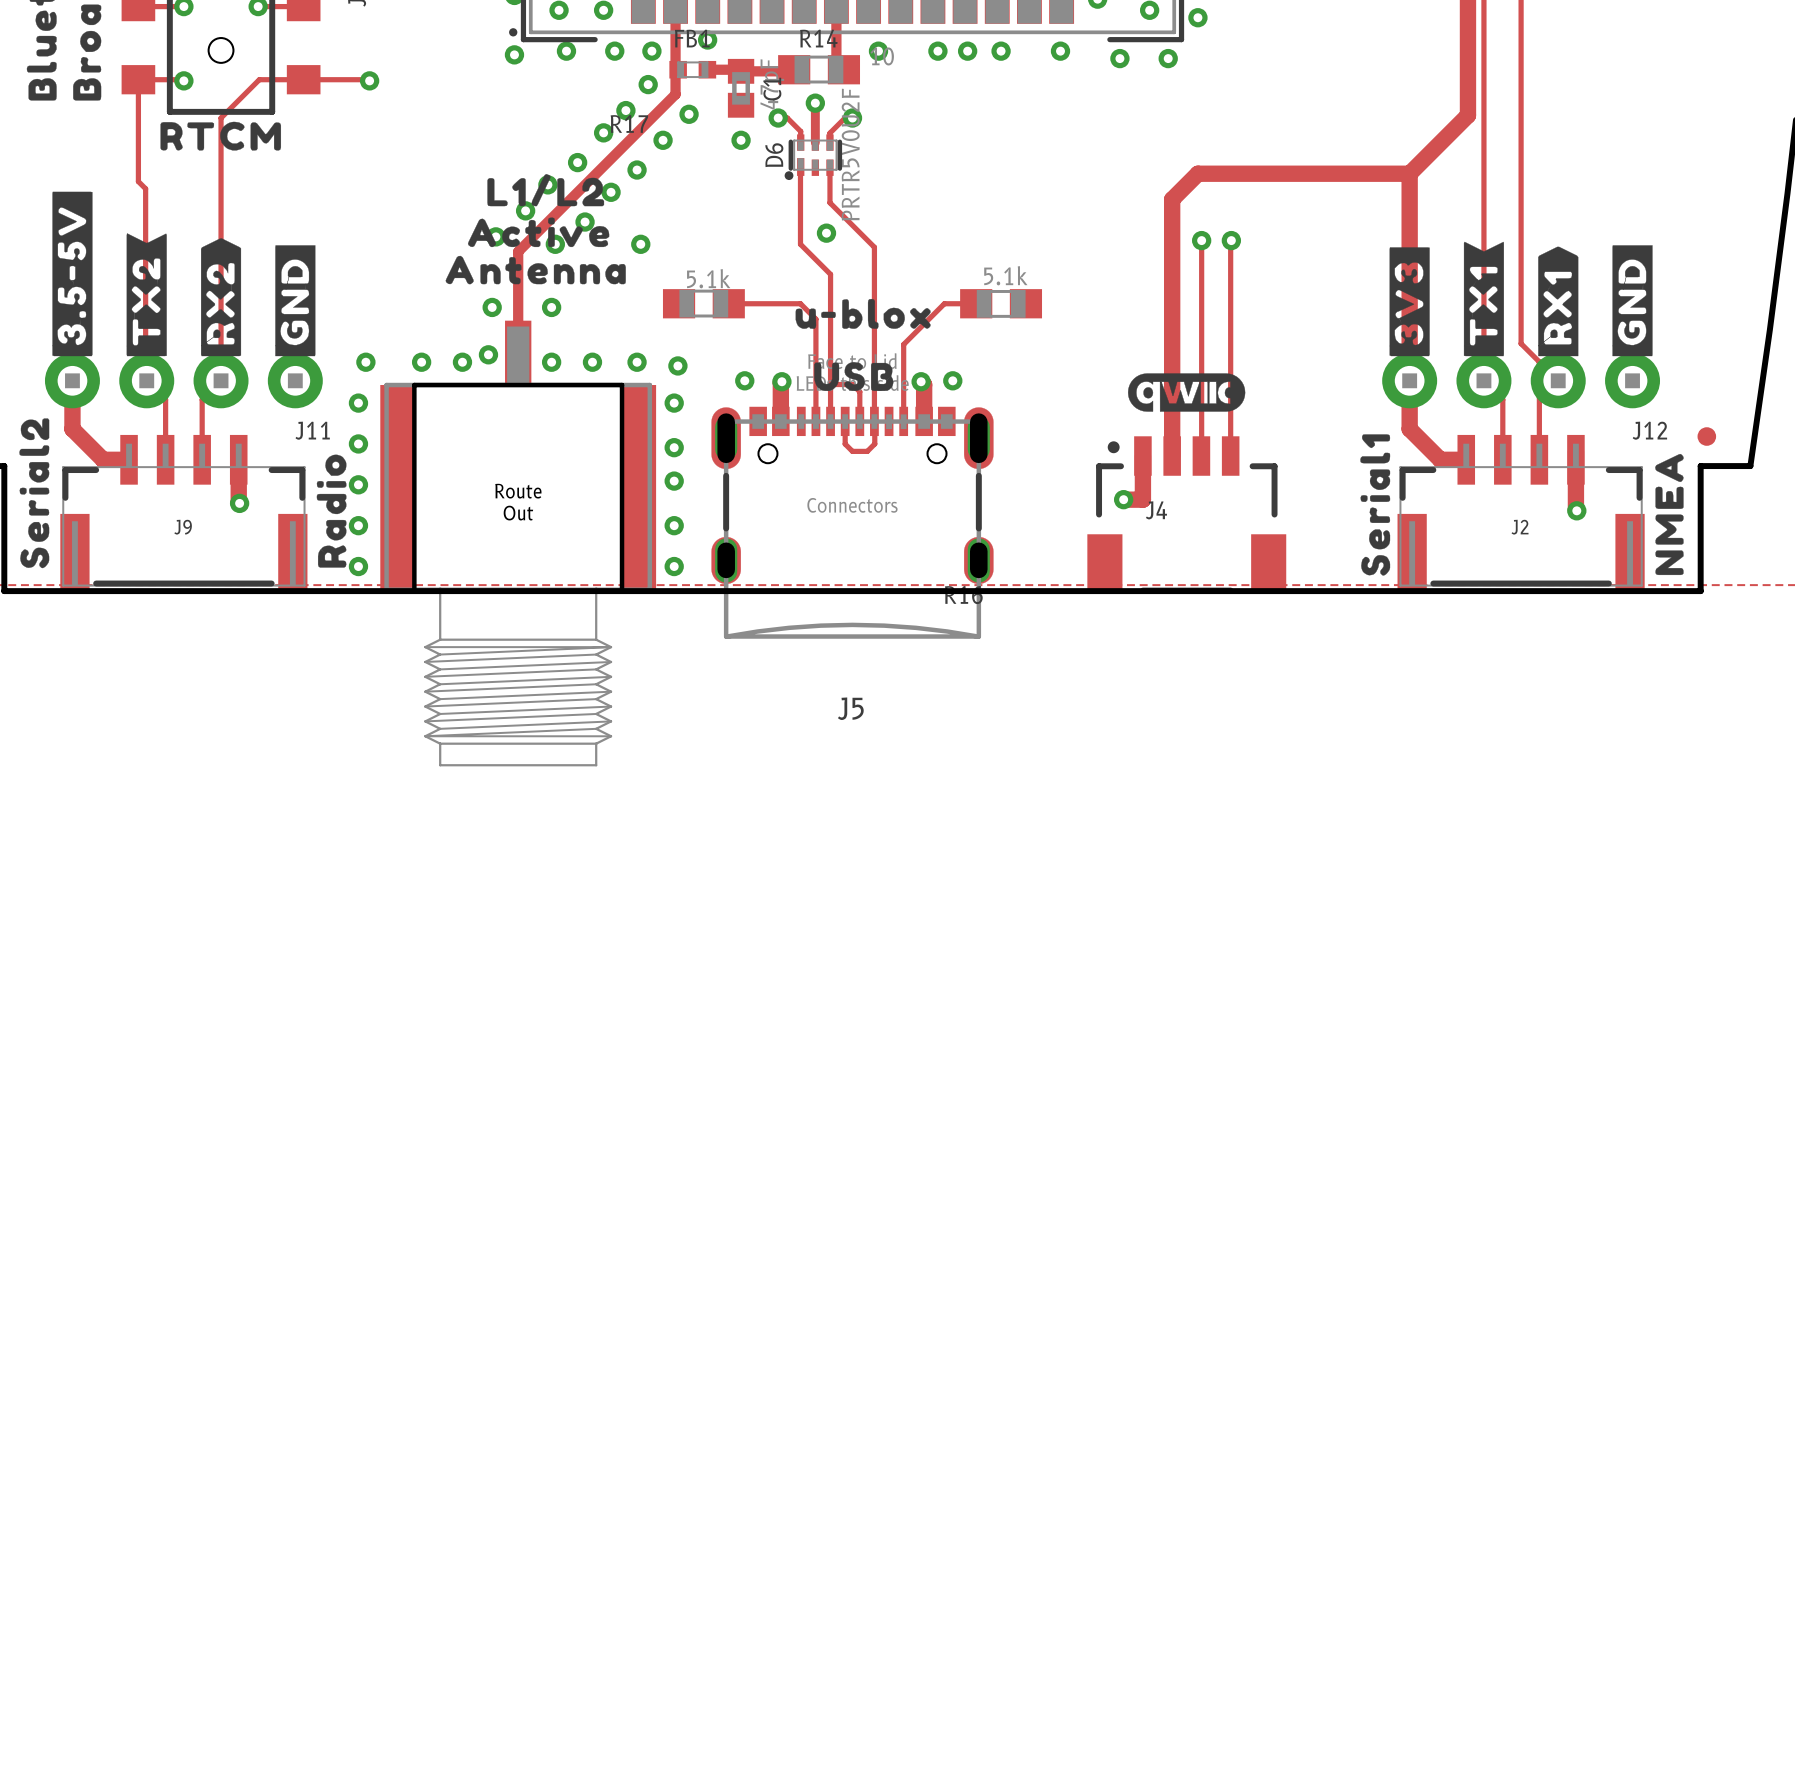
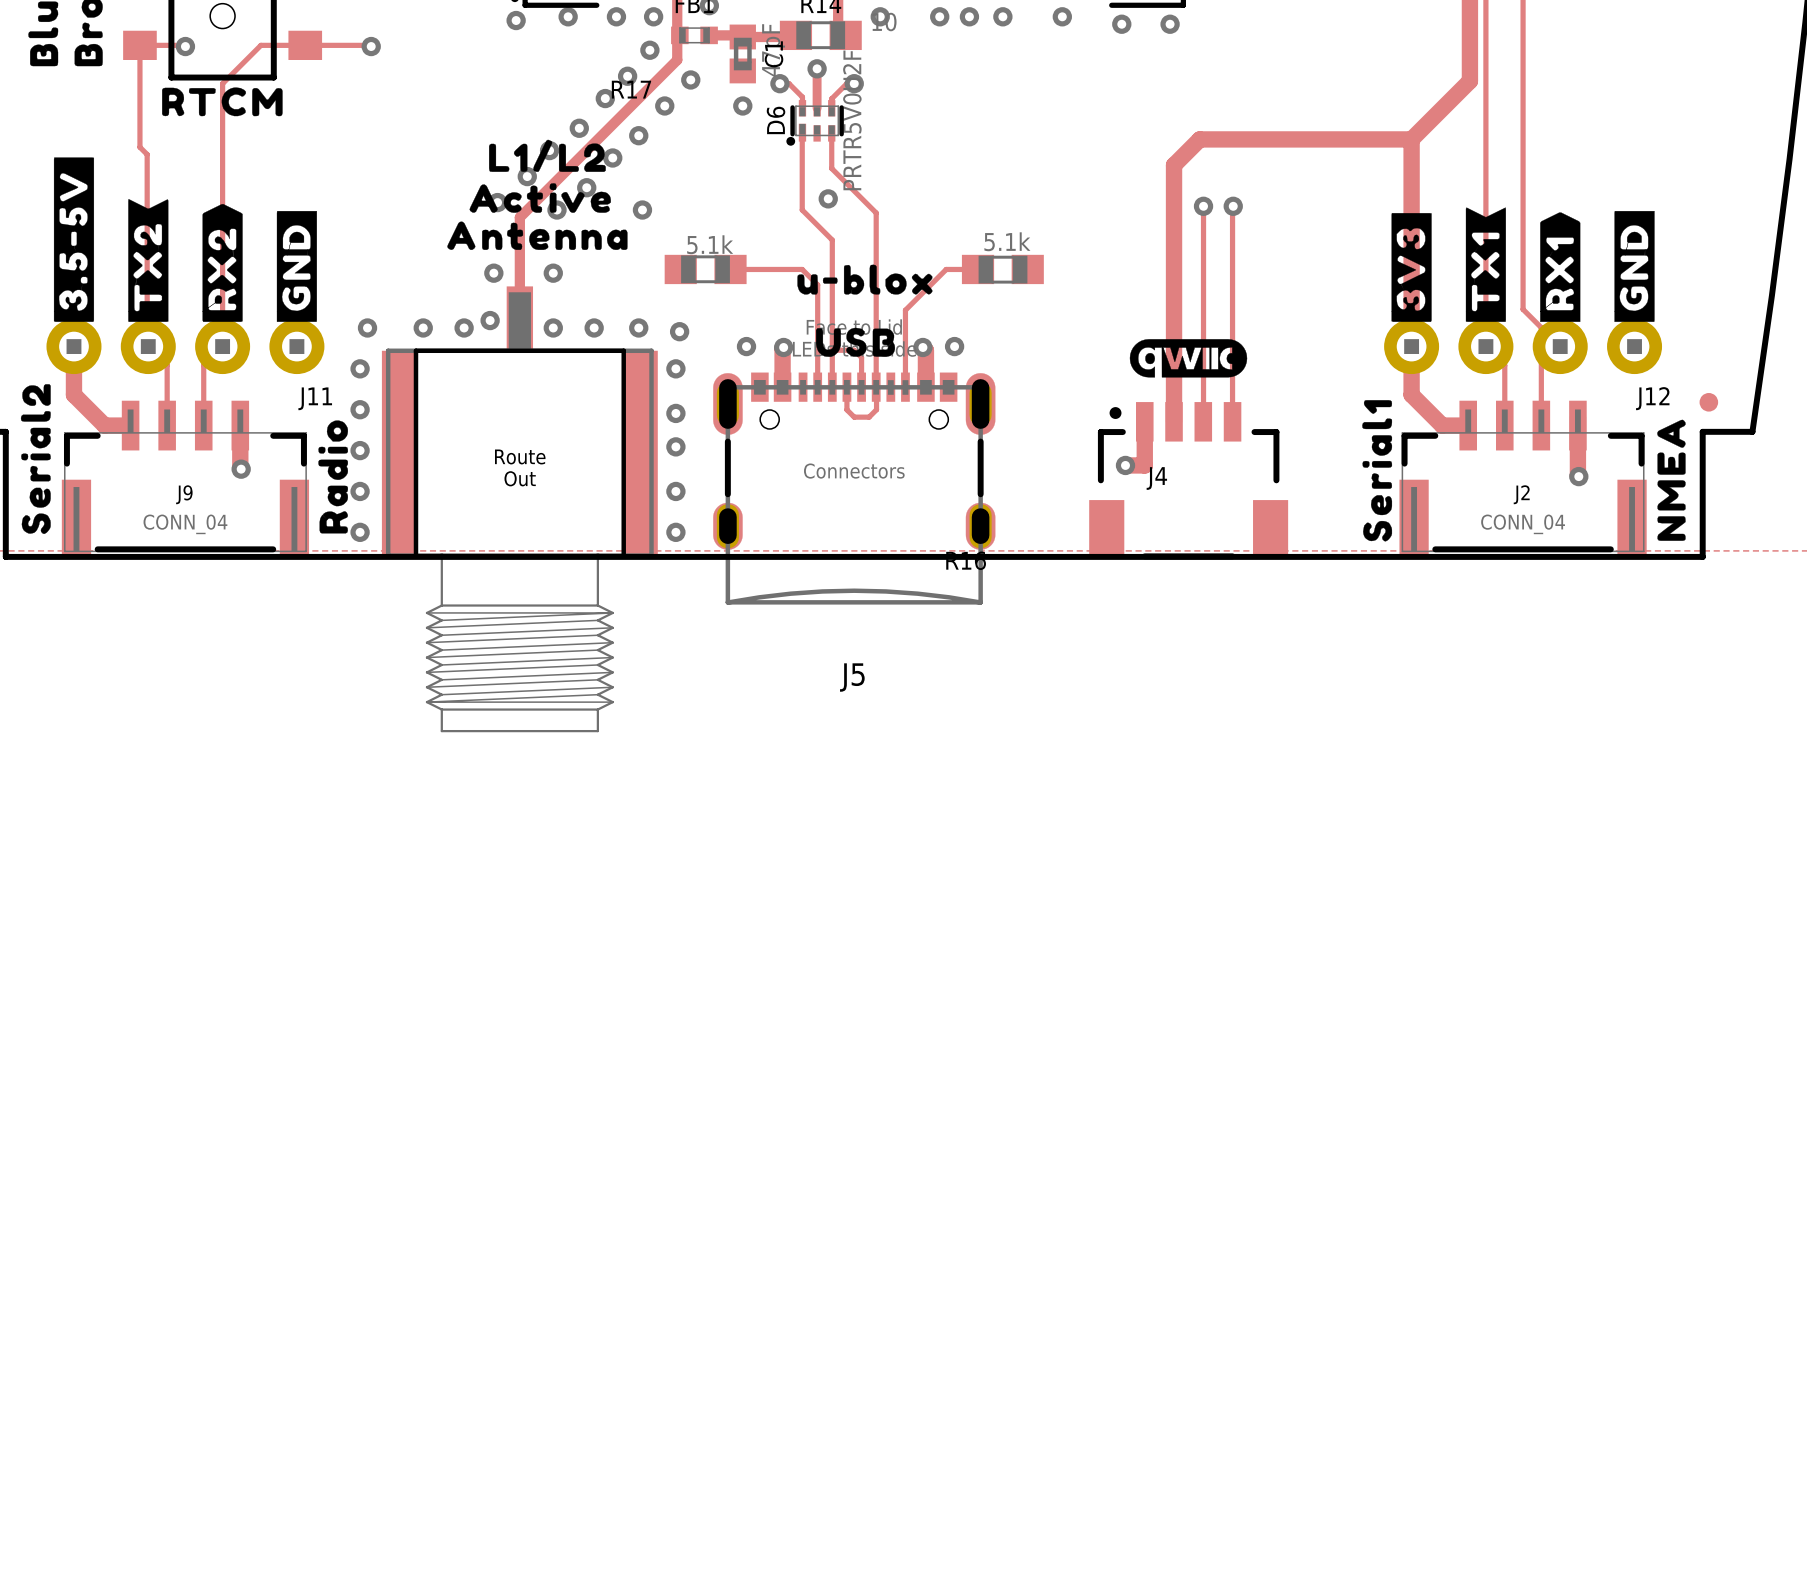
J9 value: none -> CONN_04 (185, 524)
J2 value: none -> CONN_04 (1523, 524)

